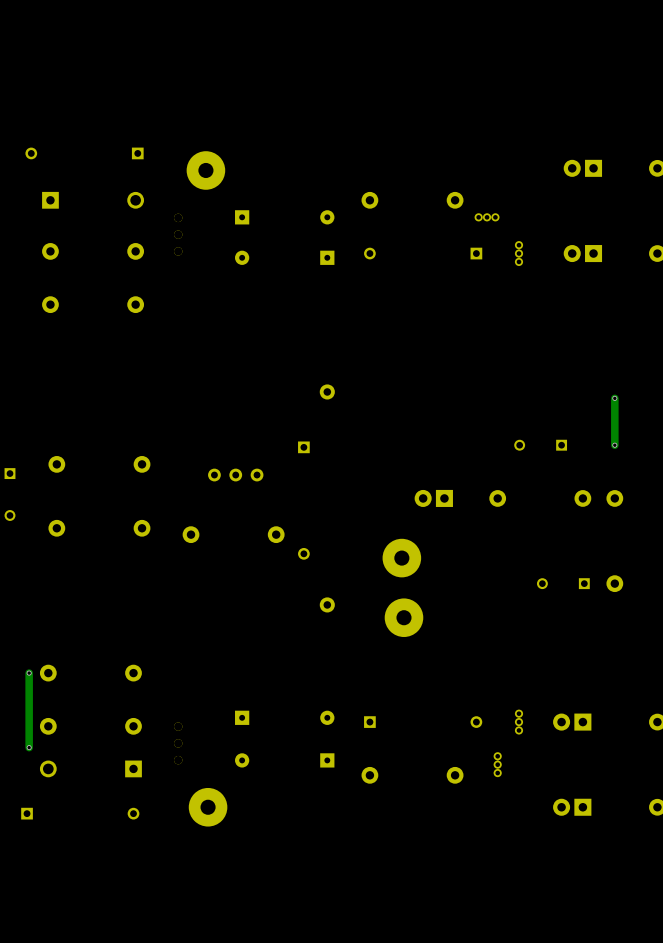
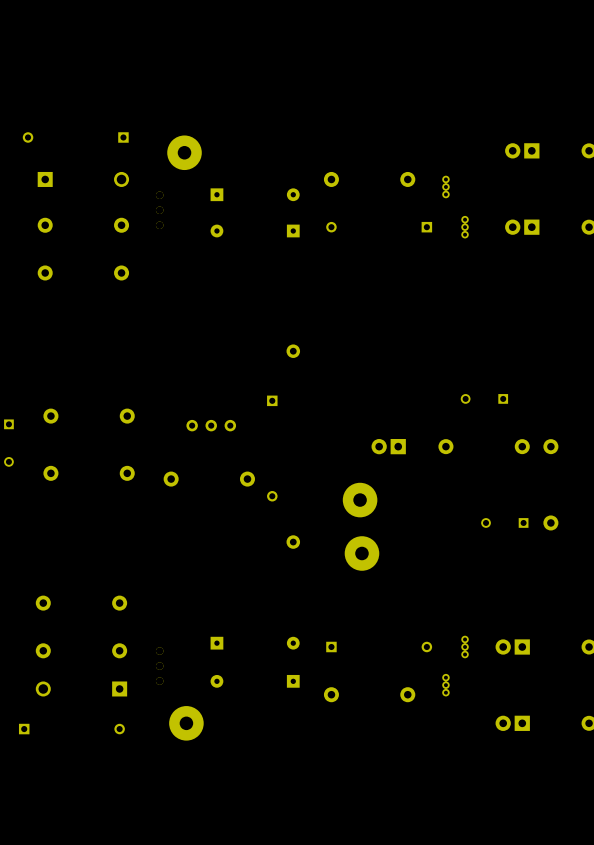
part rotation: 0° (487, 217) -> 90° clockwise (445, 186)
track: (614, 398) (614, 445) -> none
via: (614, 398) -> none
via: (614, 445) -> none
track: (29, 673) (29, 747) -> none
via: (29, 673) -> none
via: (29, 747) -> none

